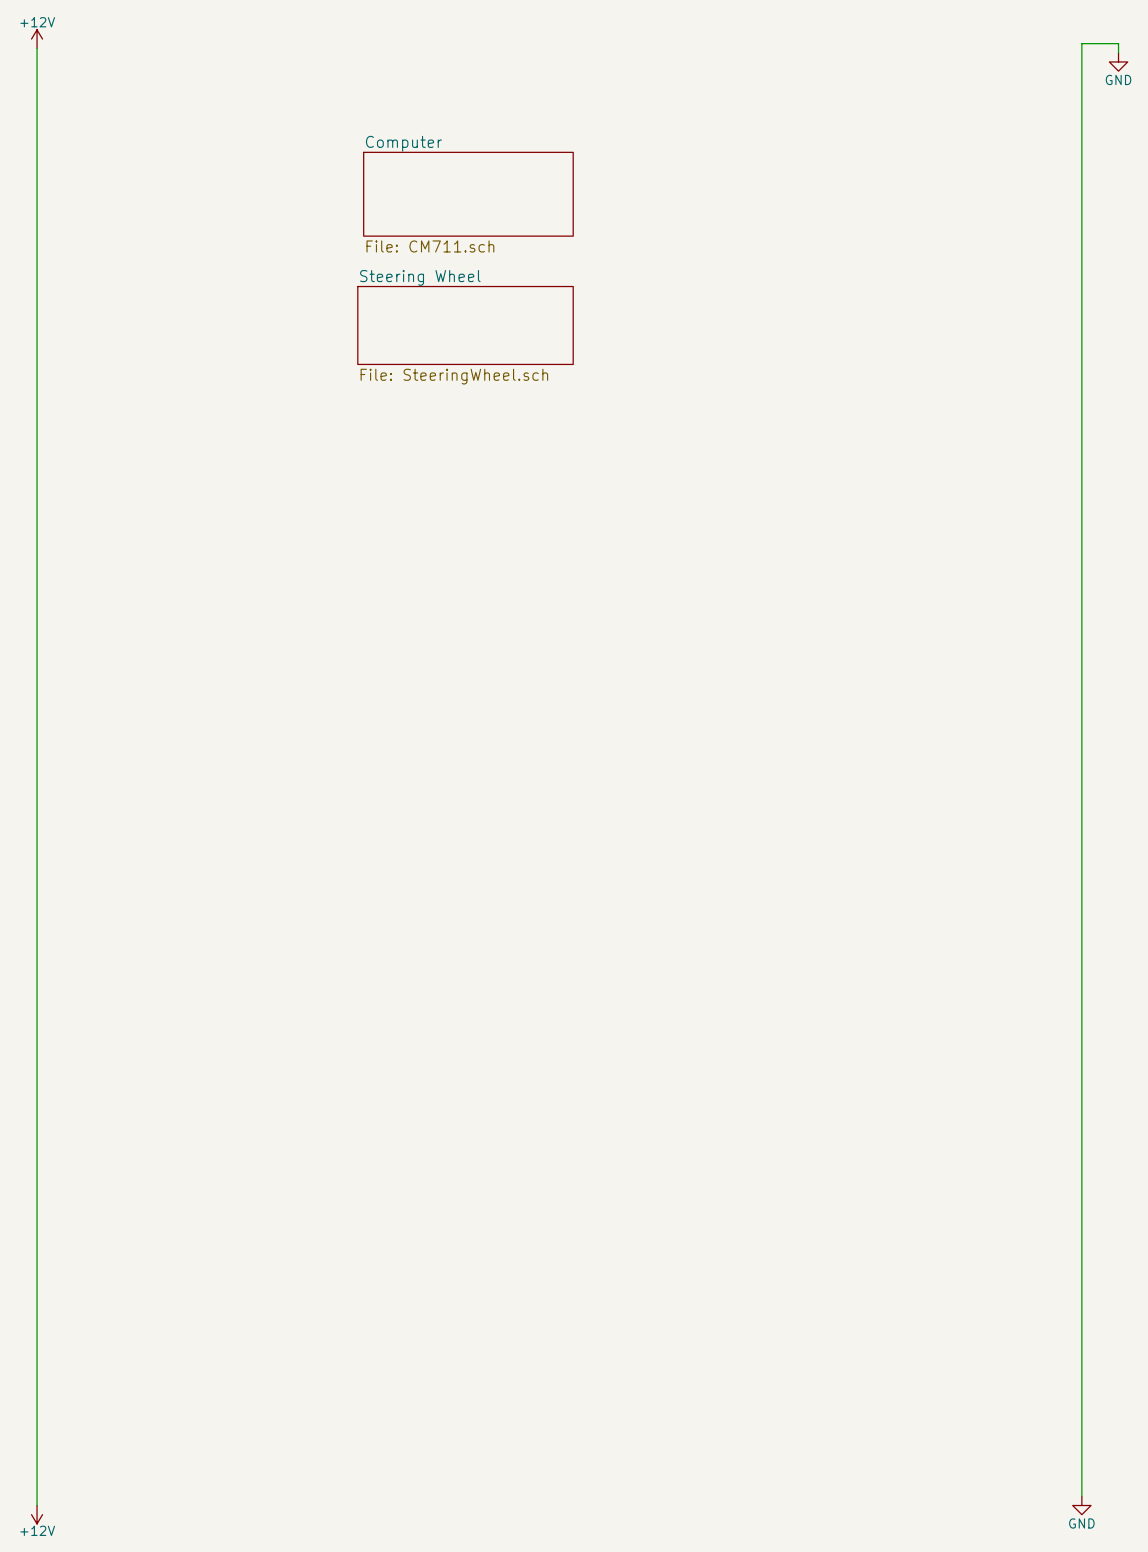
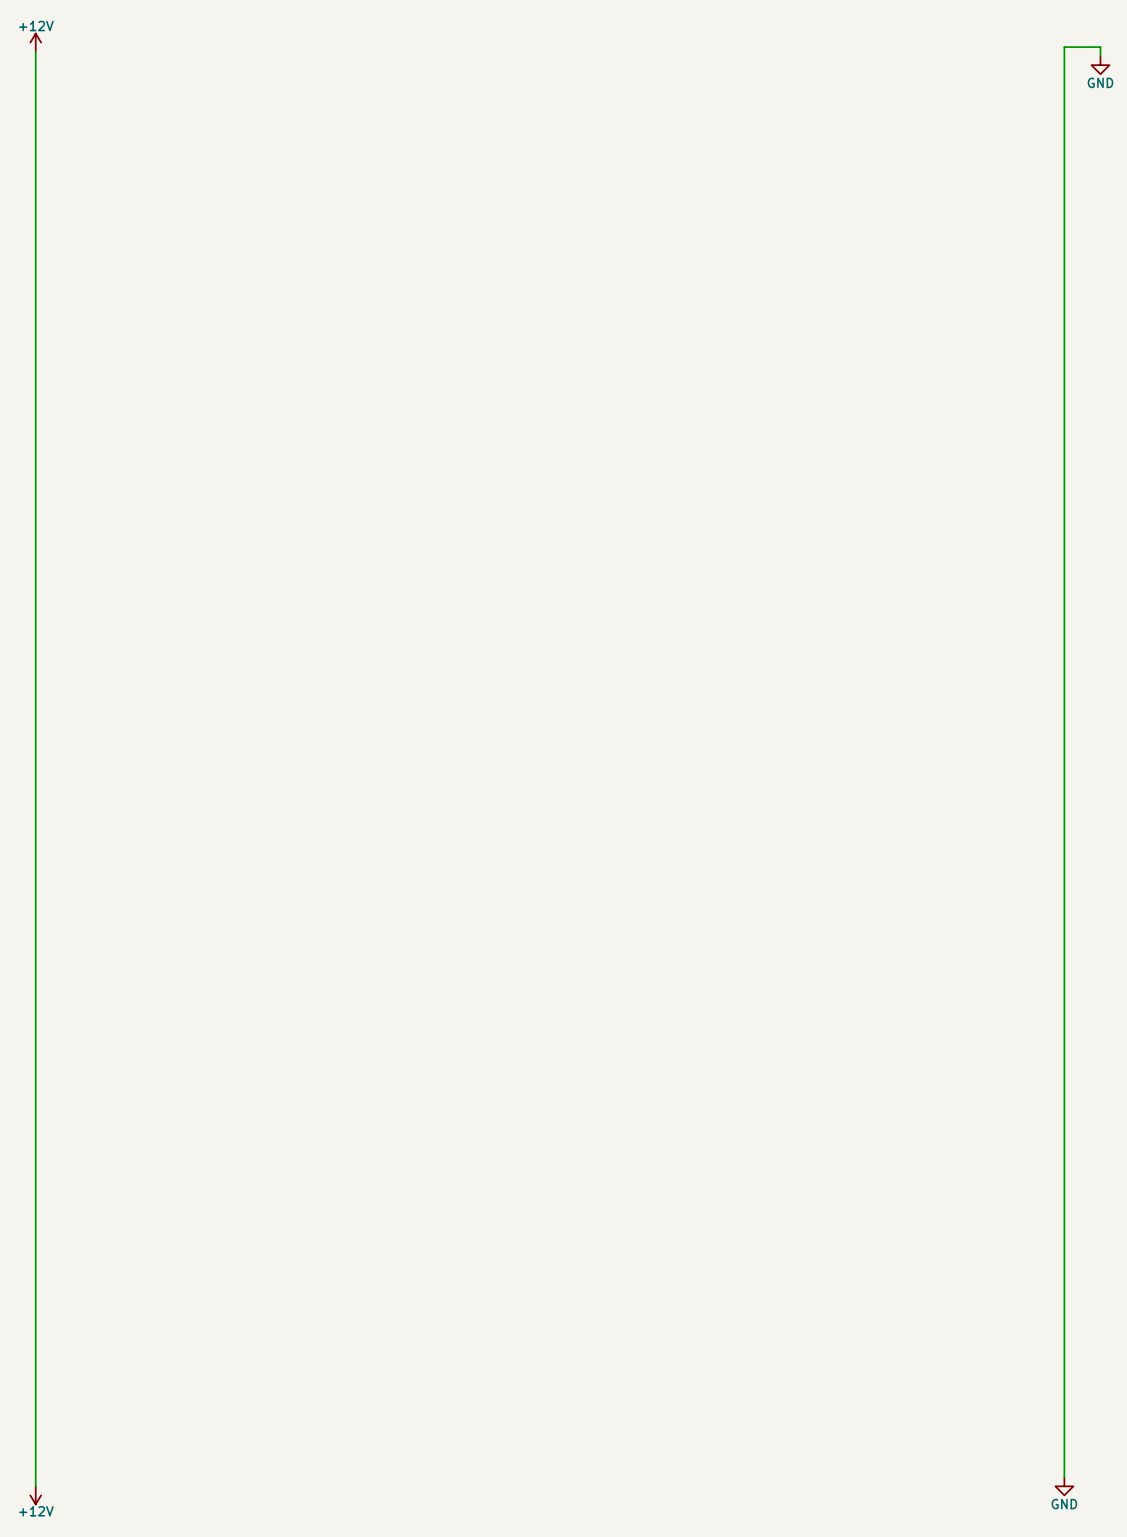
sheet Computer: File: CM711.sch (468, 194) -> none
sheet Steering Wheel: File: SteeringWheel.sch (465, 325) -> none

